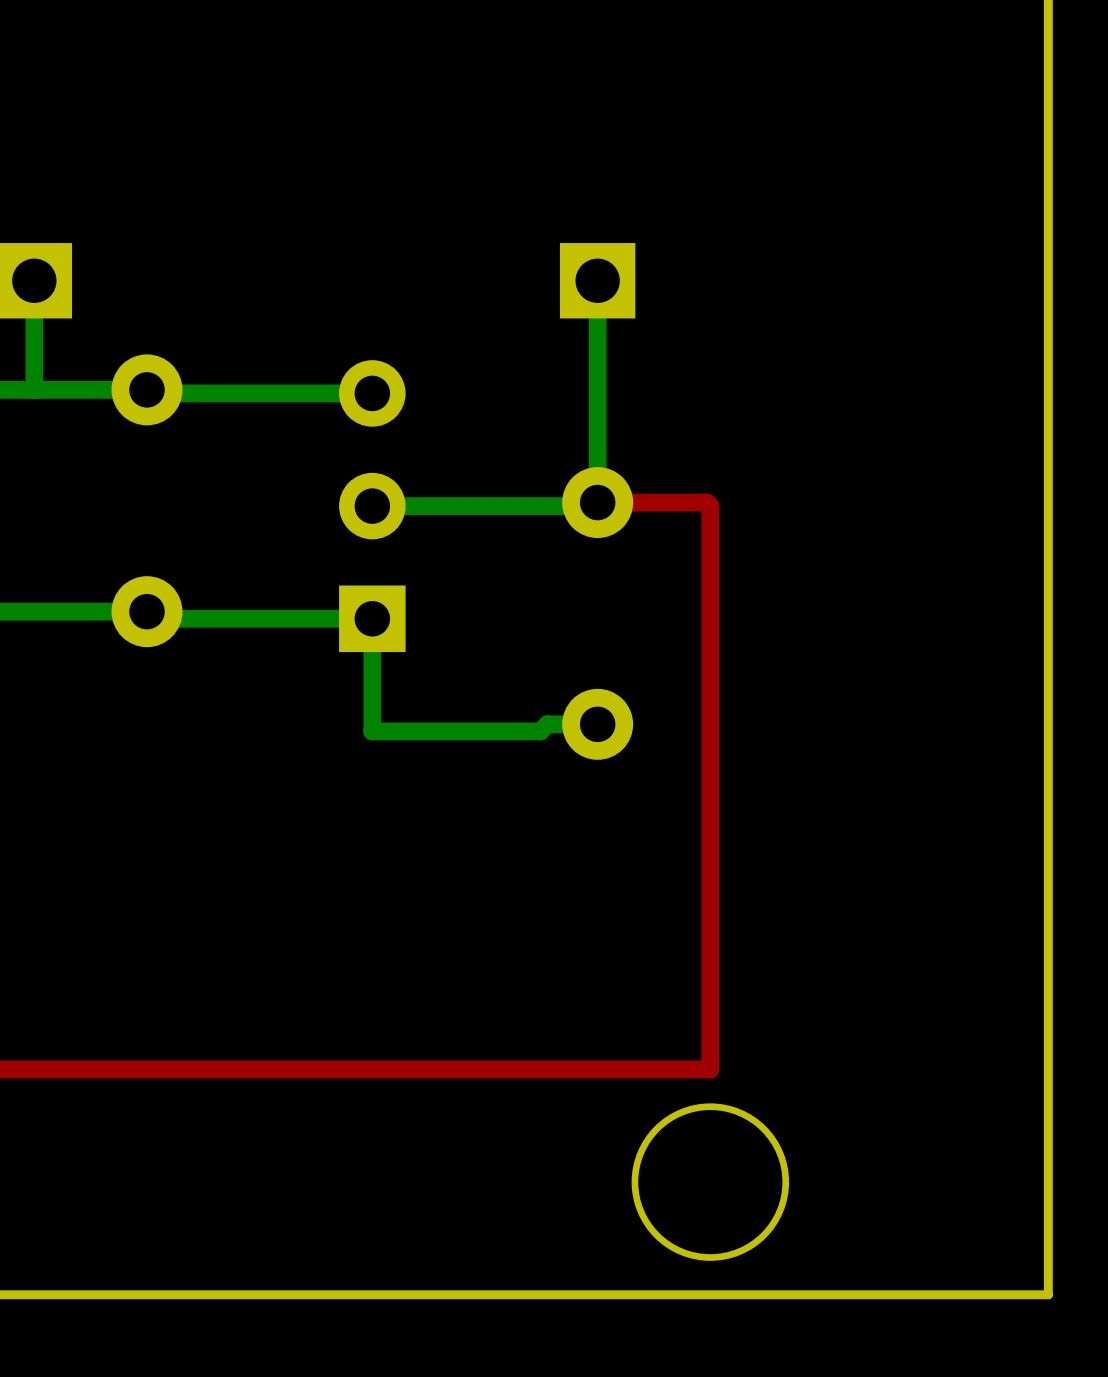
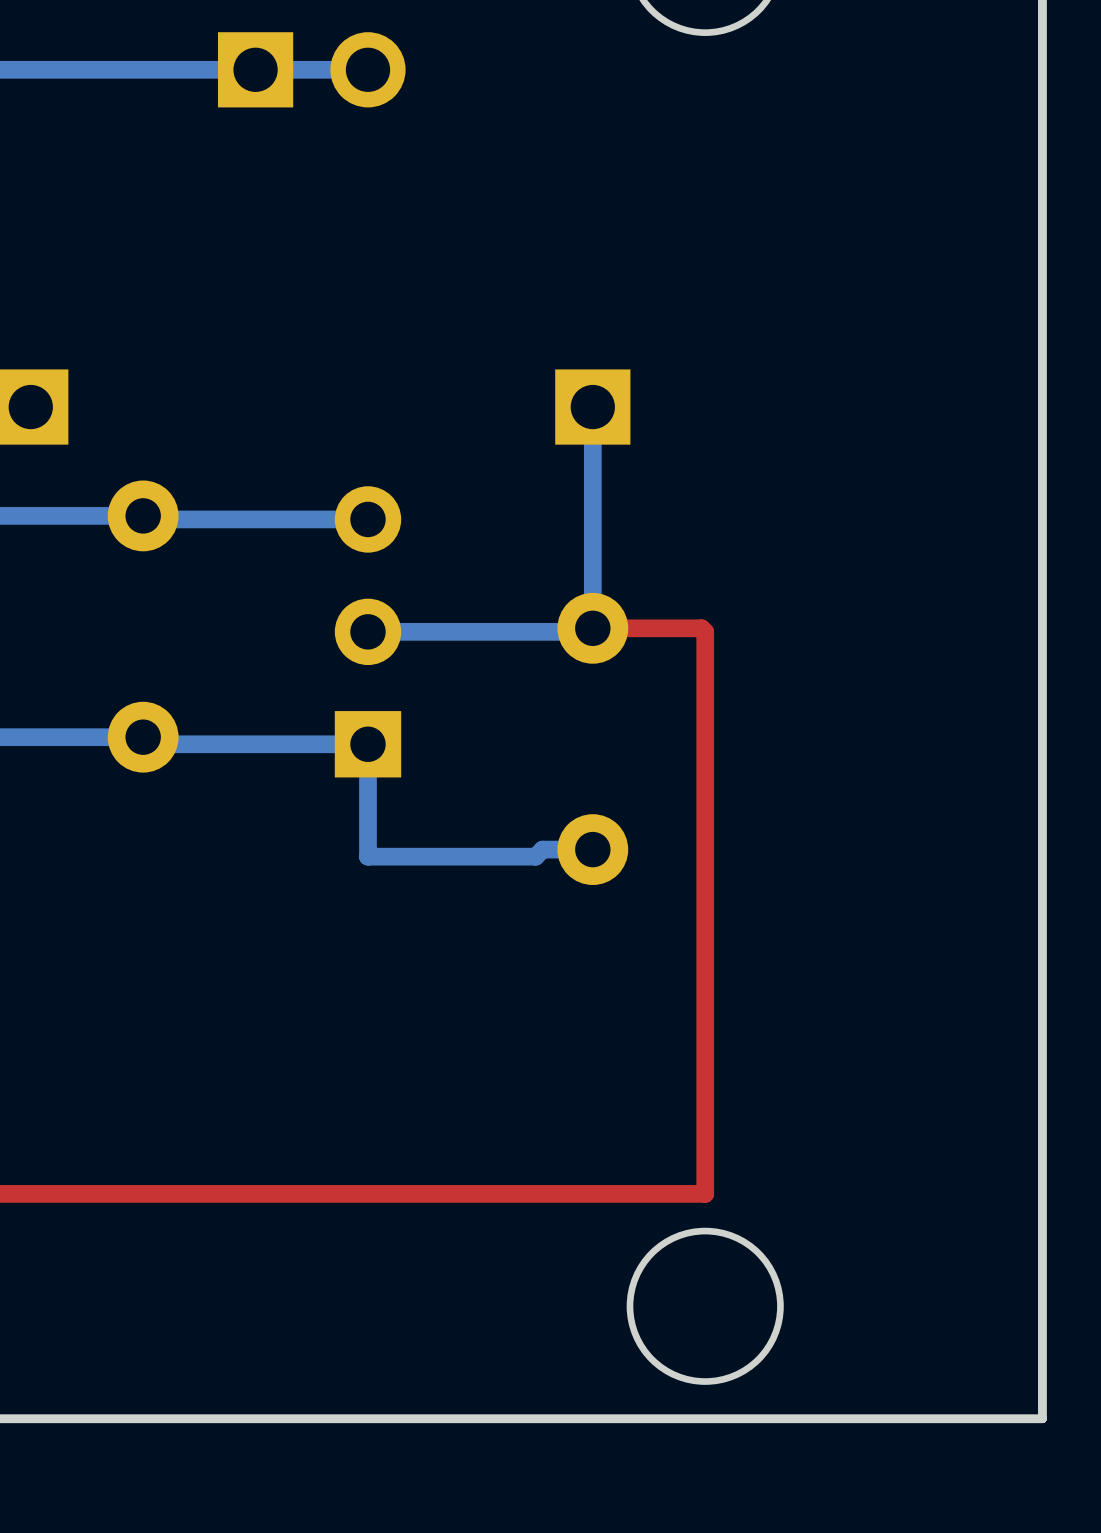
bottom track: (34, 280) (34, 389) -> none

